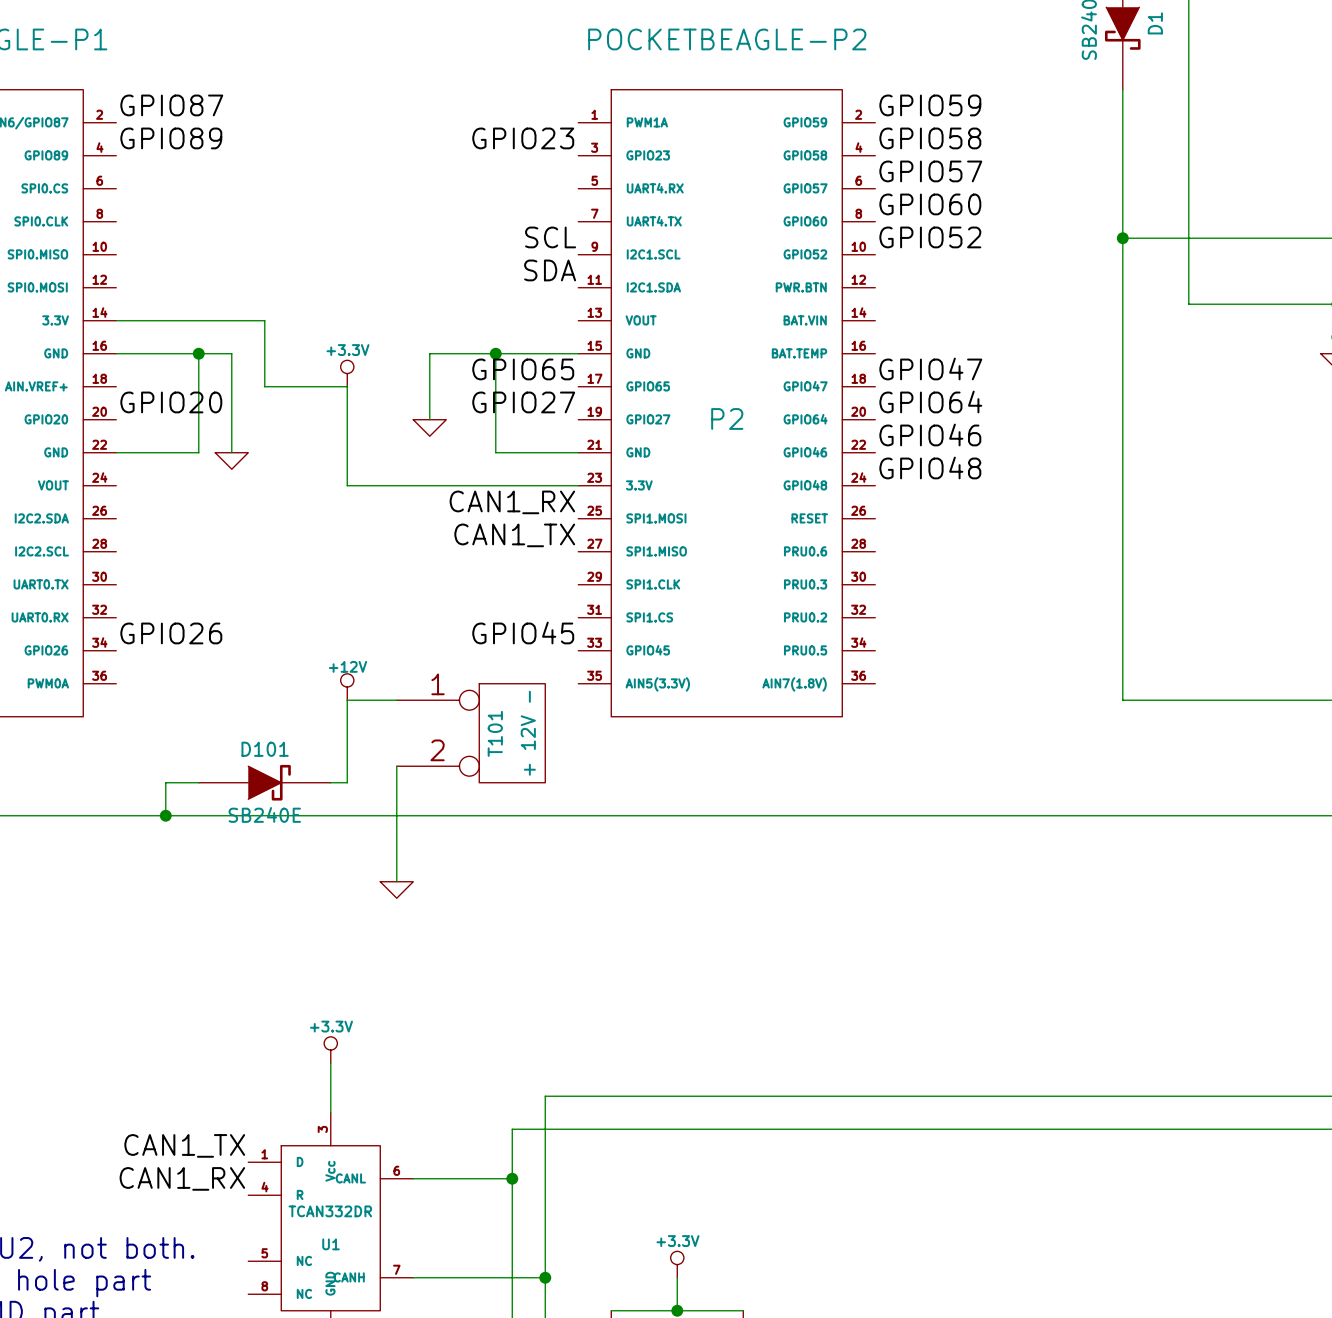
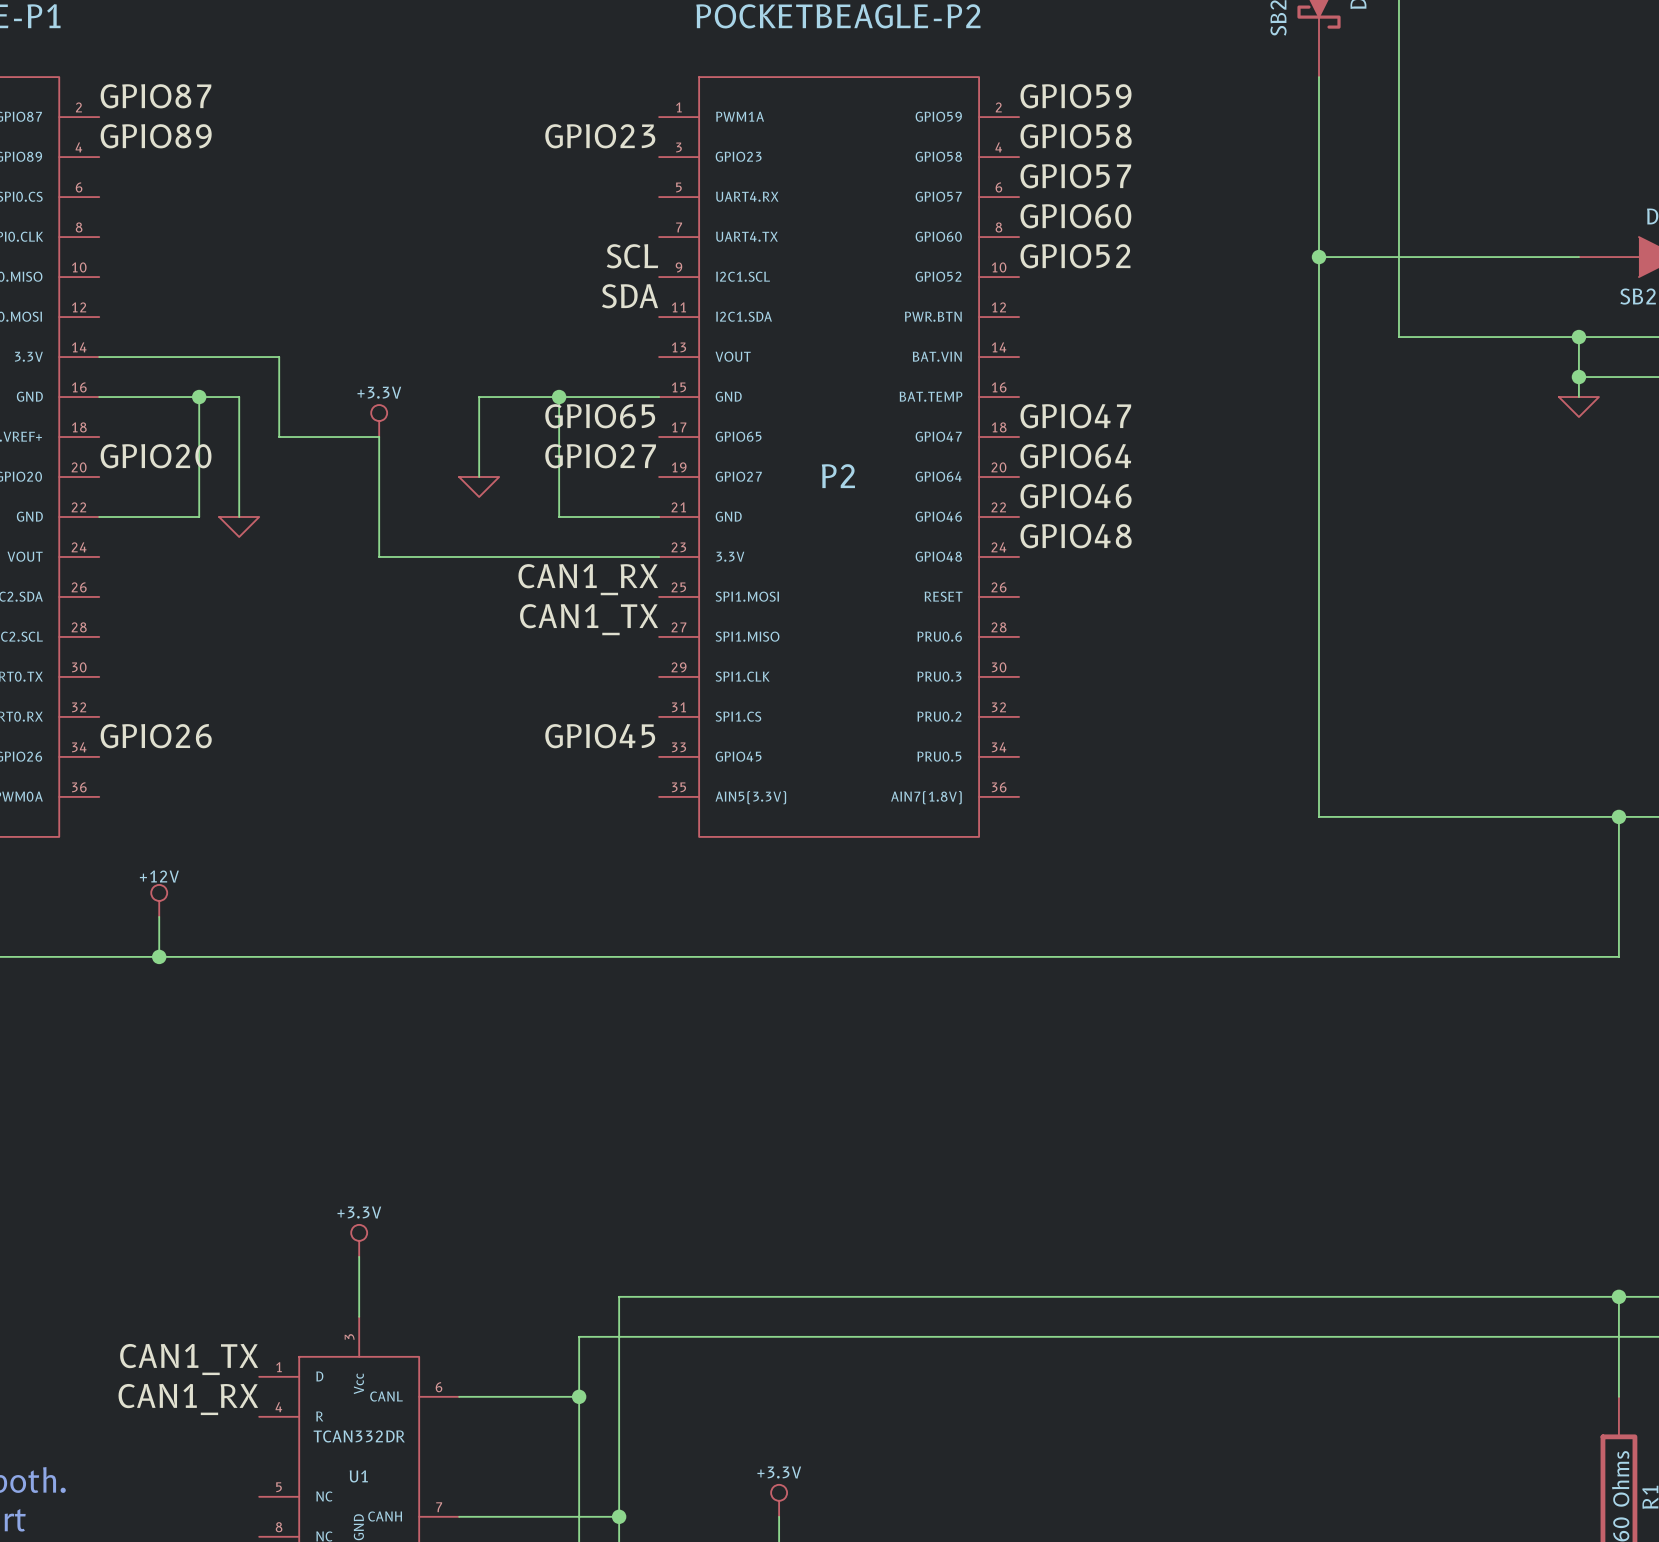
power symbol position: +12V (347, 687) -> +12V (159, 900)
wire: (396, 700) (347, 700) (347, 782) (330, 782) -> none
T101: + 12V - (471, 733) -> none
wire: (396, 766) (396, 881) -> none
wire: (165, 782) (198, 782) -> none
D101: SB240E (264, 782) -> none
power symbol: (396, 889) -> none

